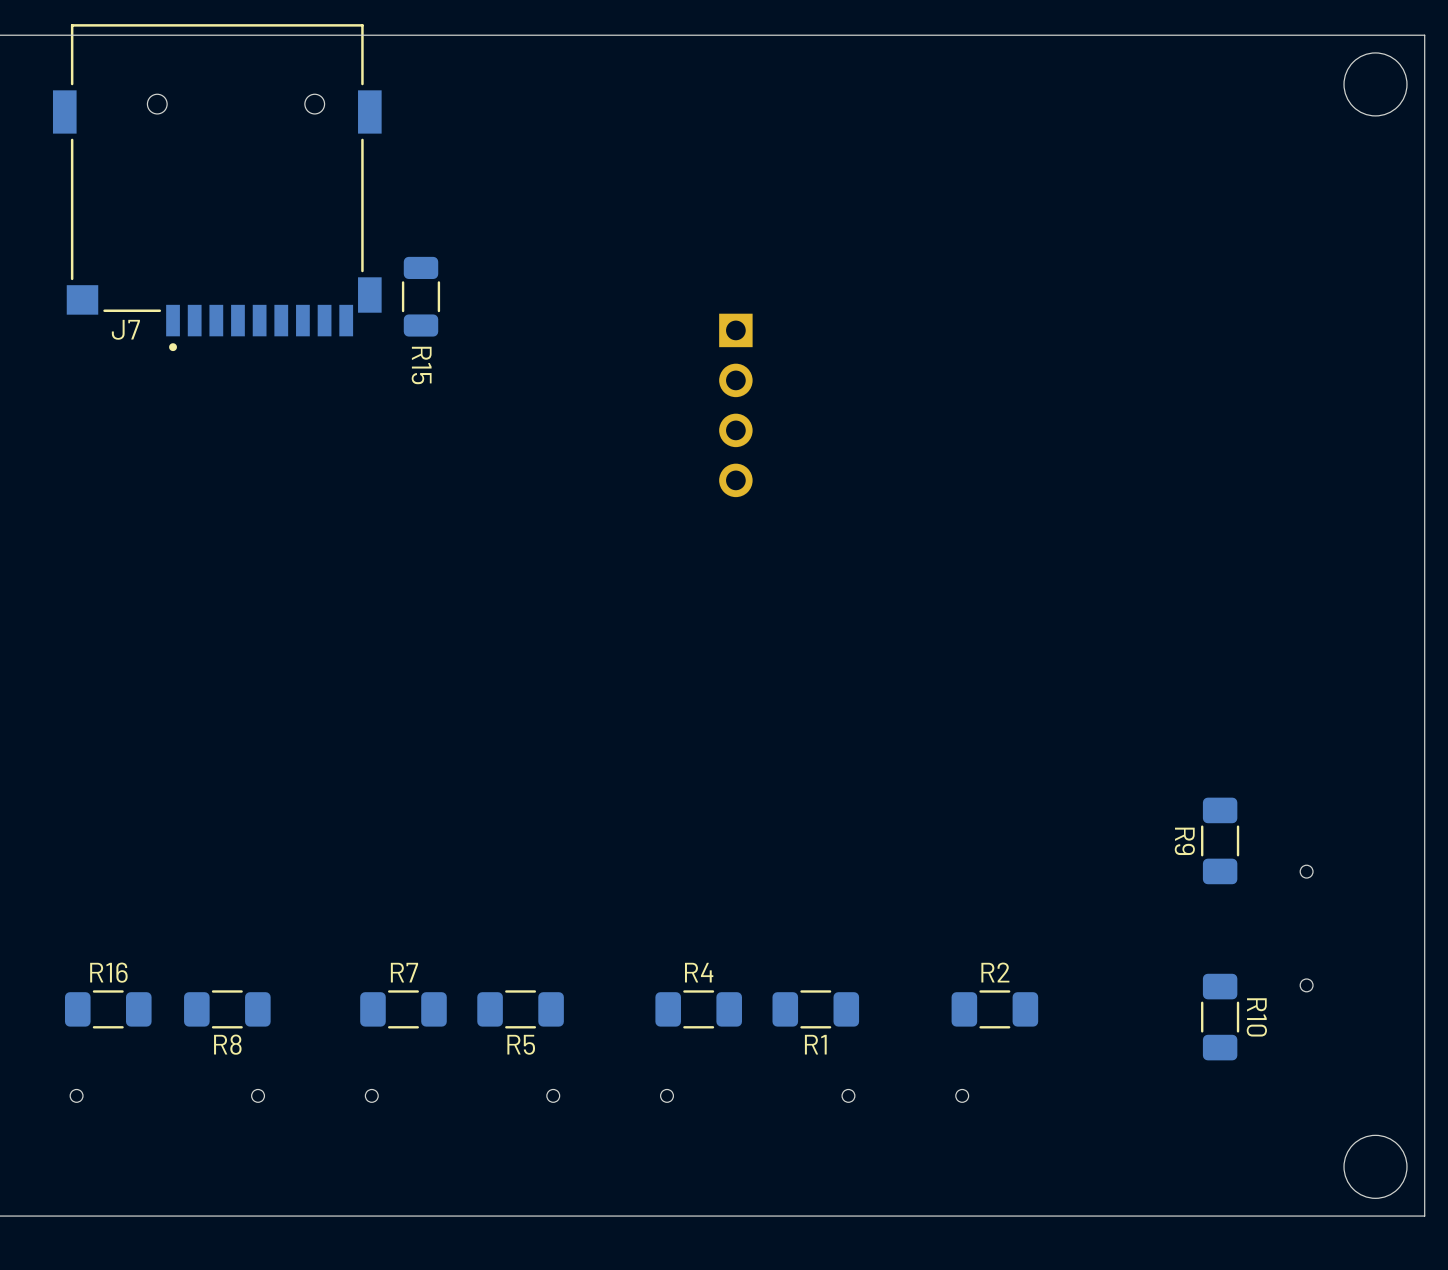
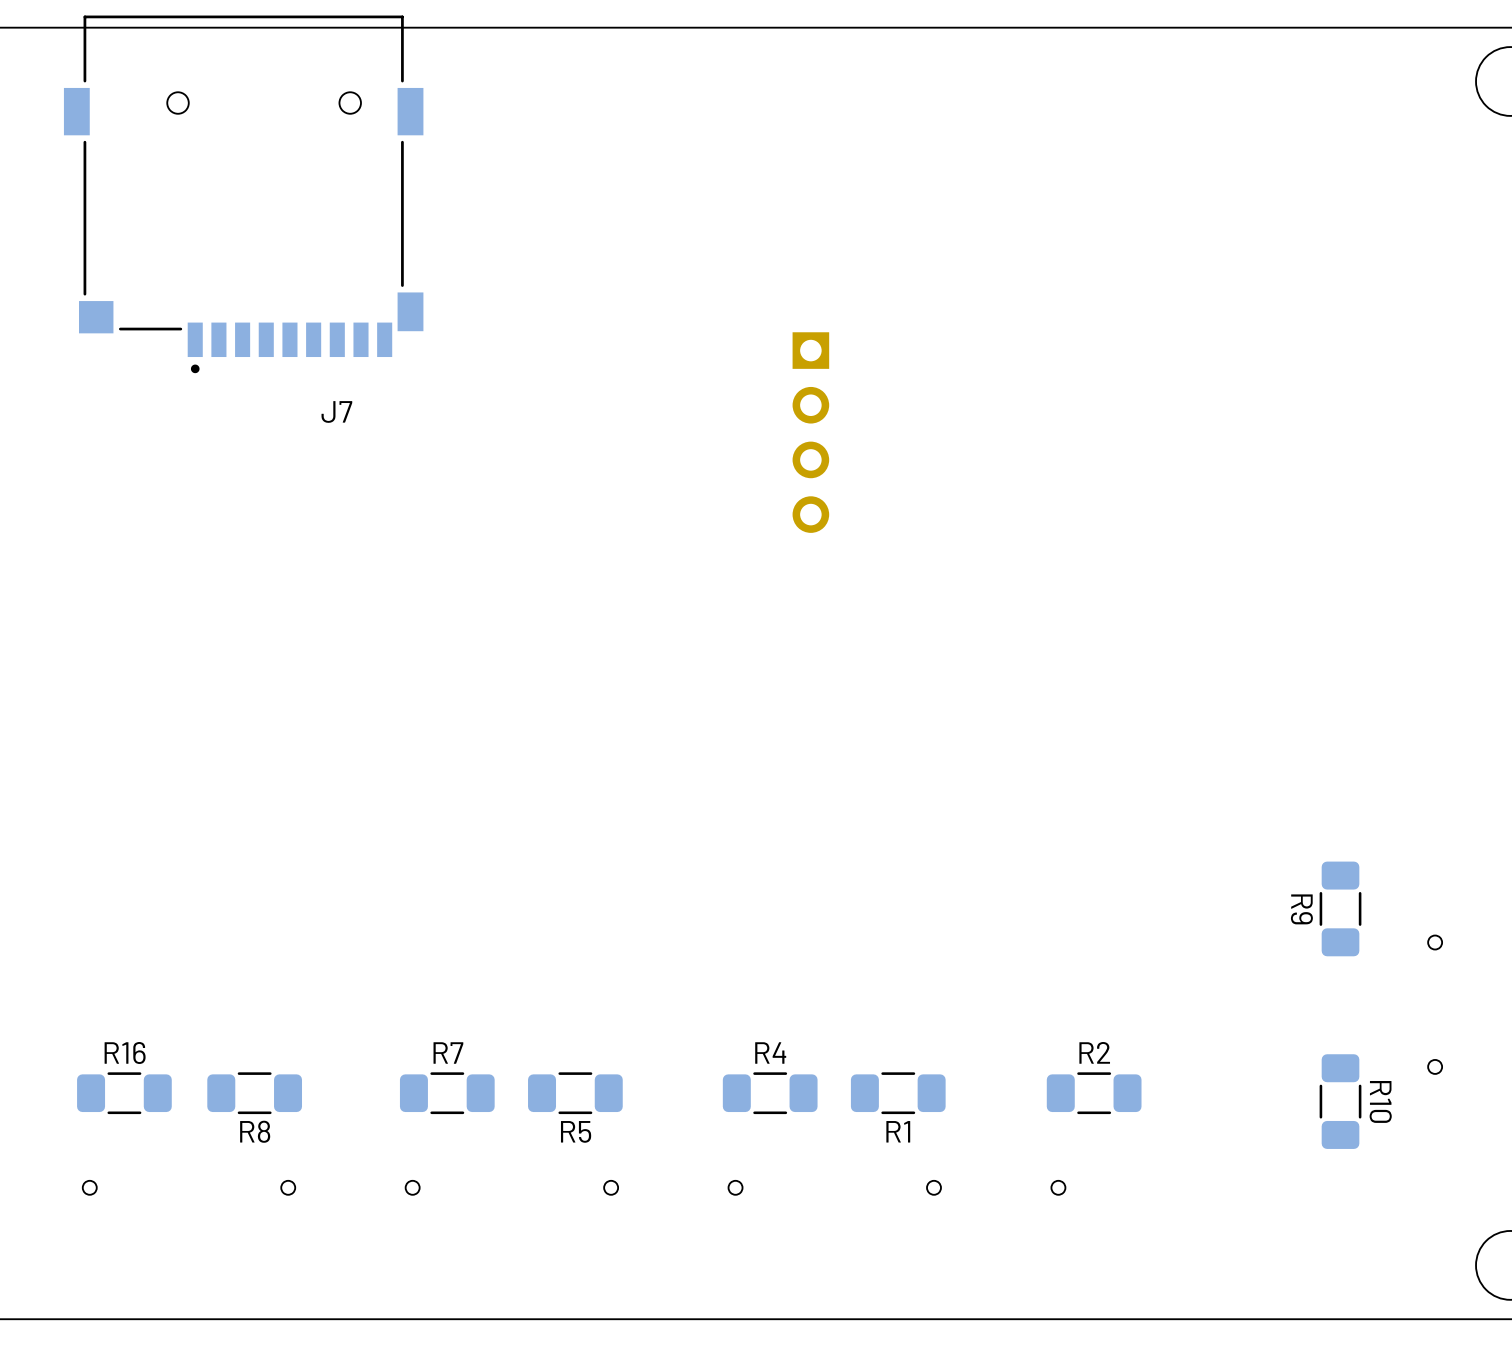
R15: (421, 296) -> none
J7 name position: J7 (125, 329) -> J7 (336, 411)

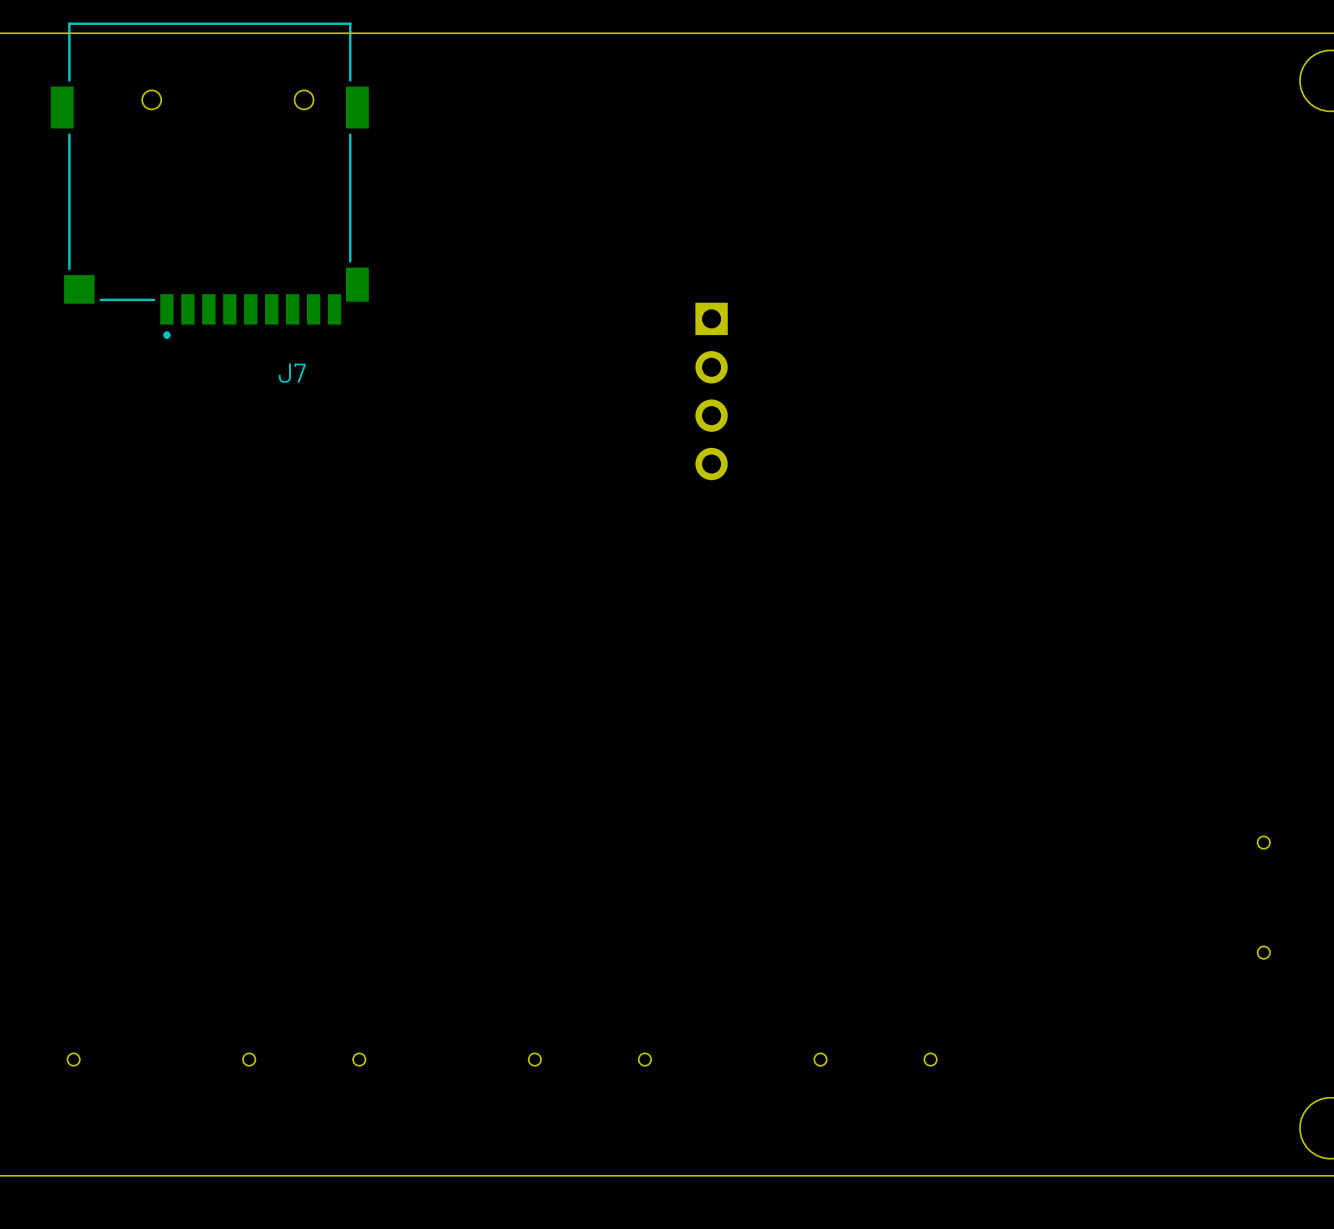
R9: (1340, 908) -> none
R16: (124, 1093) -> none
R8: (254, 1093) -> none
R7: (447, 1093) -> none
R5: (575, 1093) -> none
R4: (770, 1093) -> none
R1: (898, 1093) -> none
R2: (1094, 1093) -> none
R10: (1340, 1101) -> none

